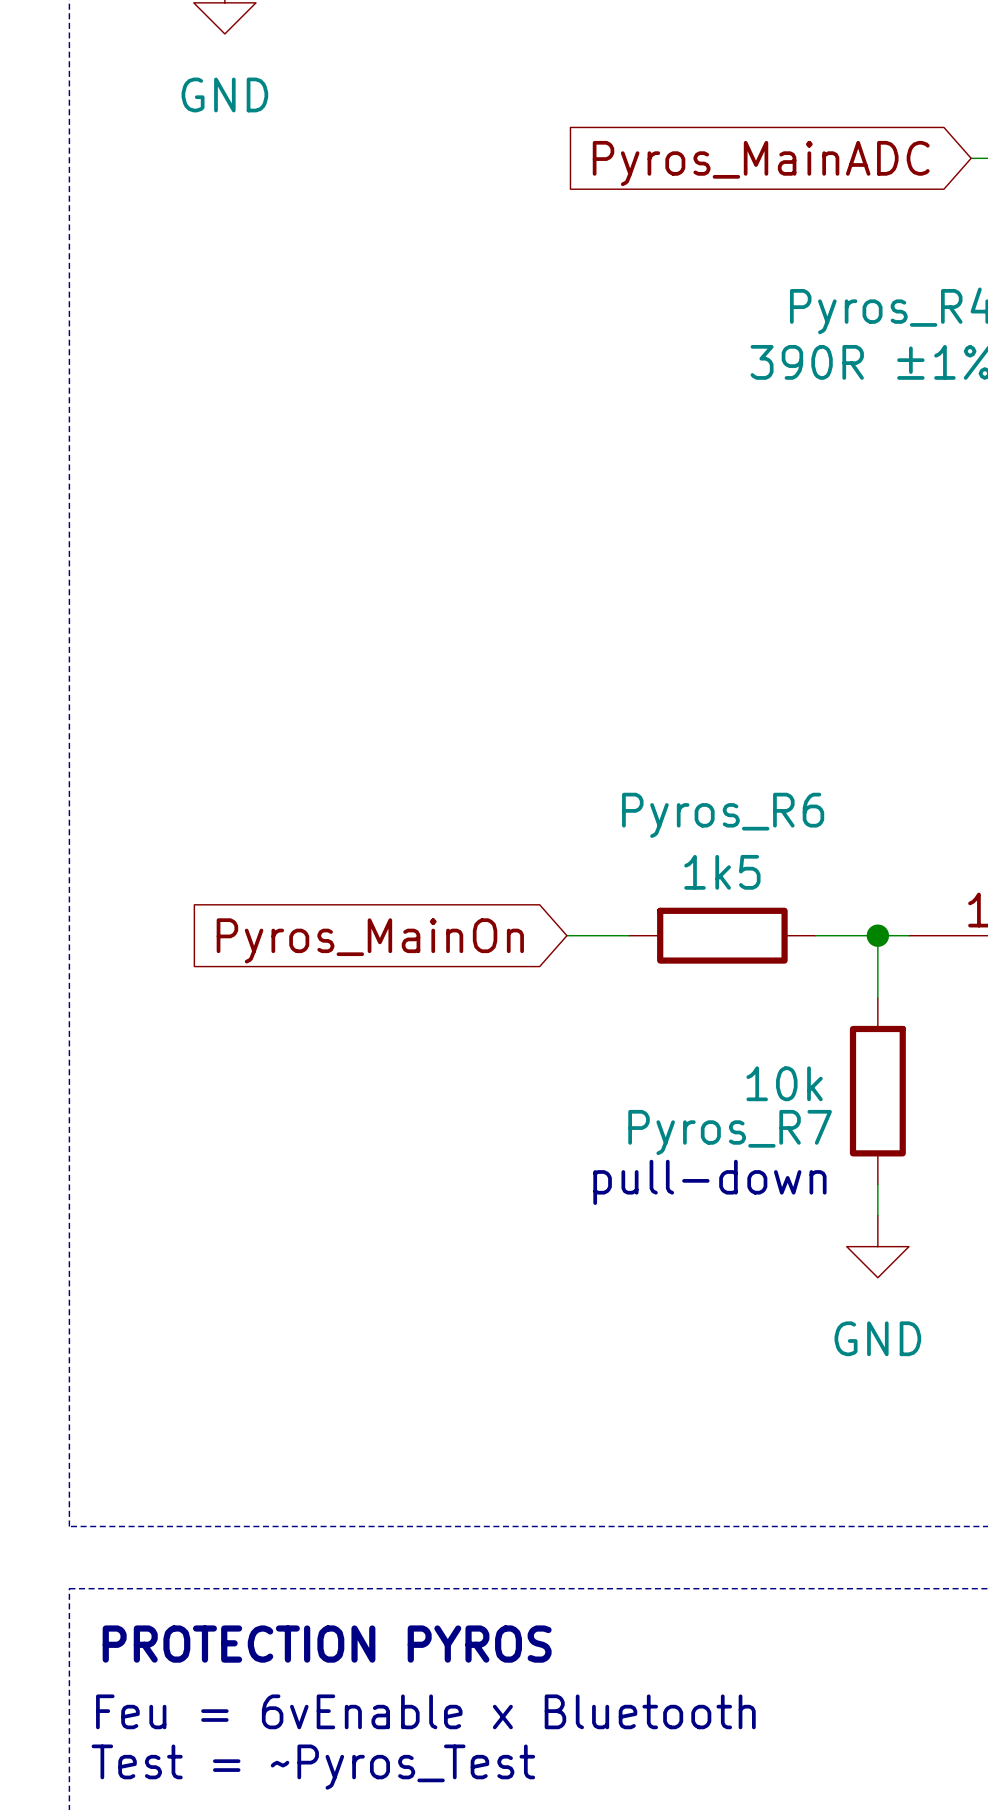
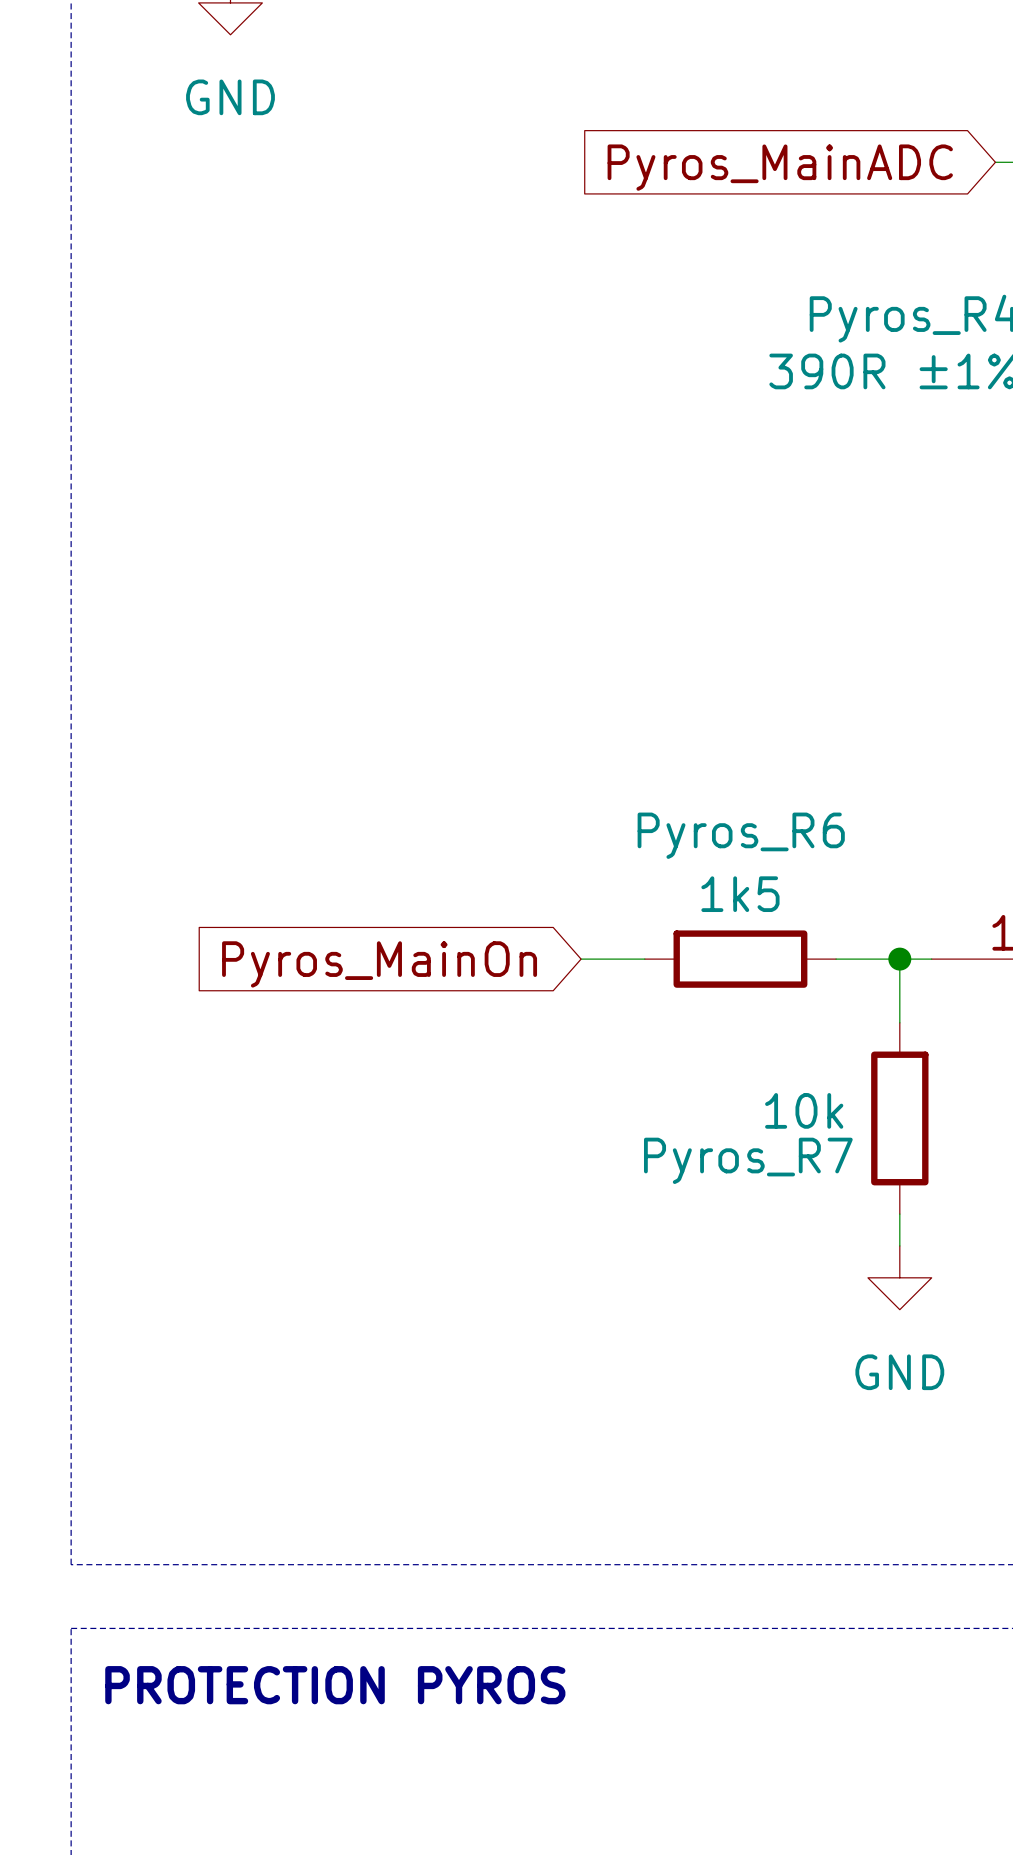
text: pull-down (709, 1182) -> none
text: Feu = 6vEnable x Bluetooth (425, 1711) -> none
text: Test = ~Pyros_Test (313, 1767) -> none

